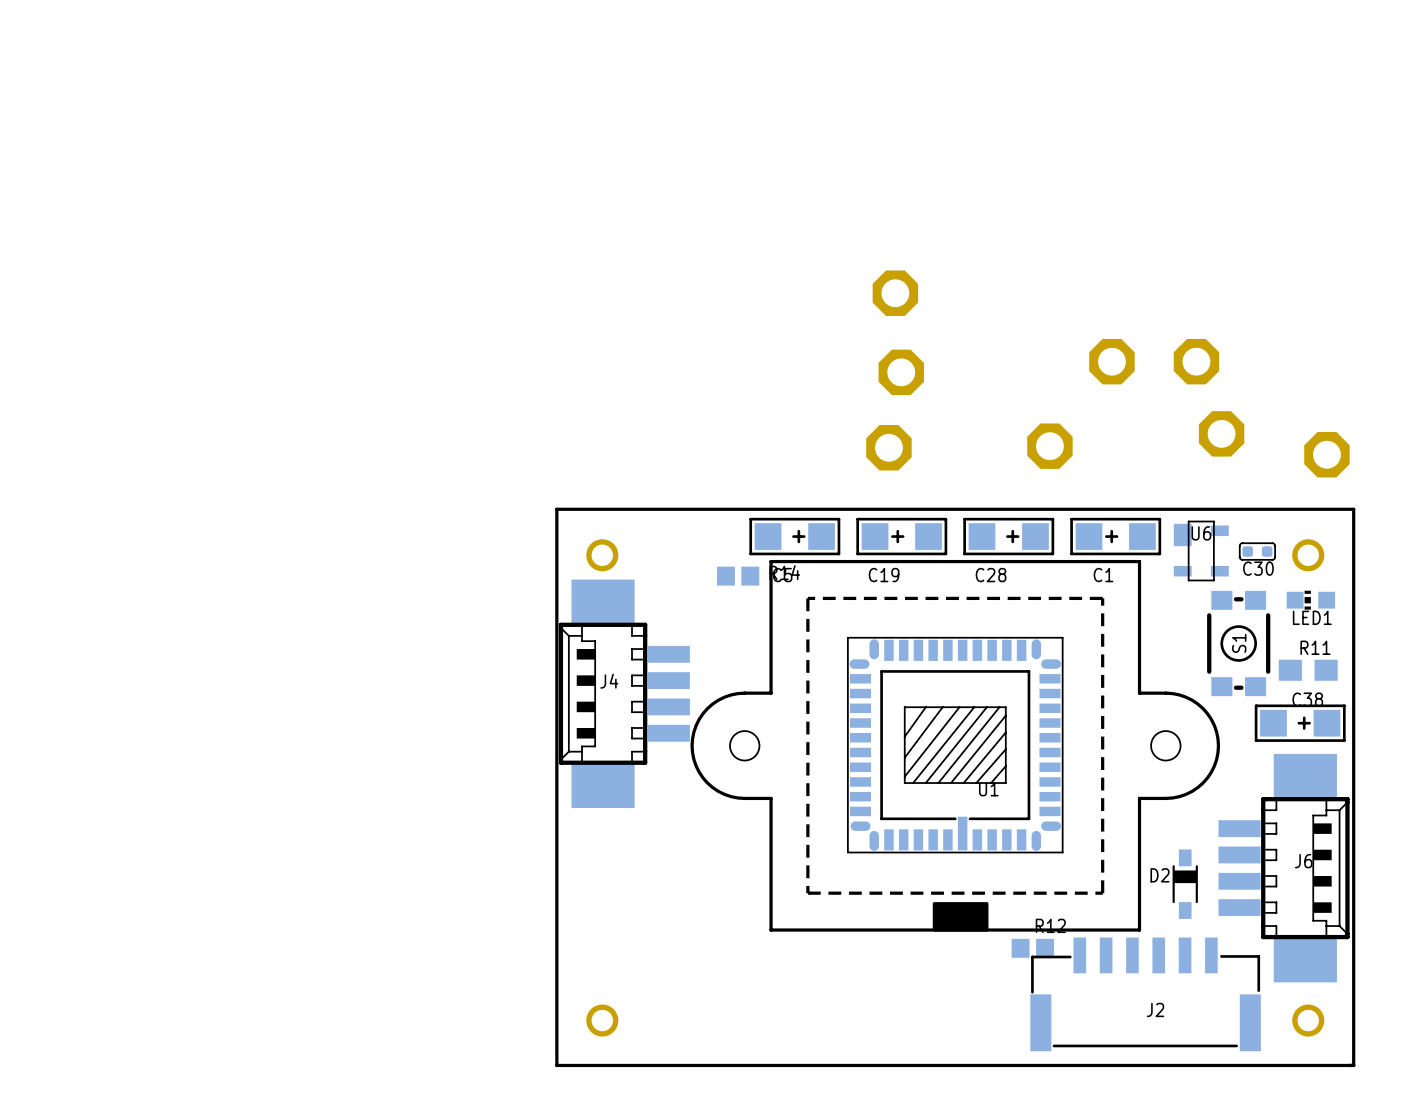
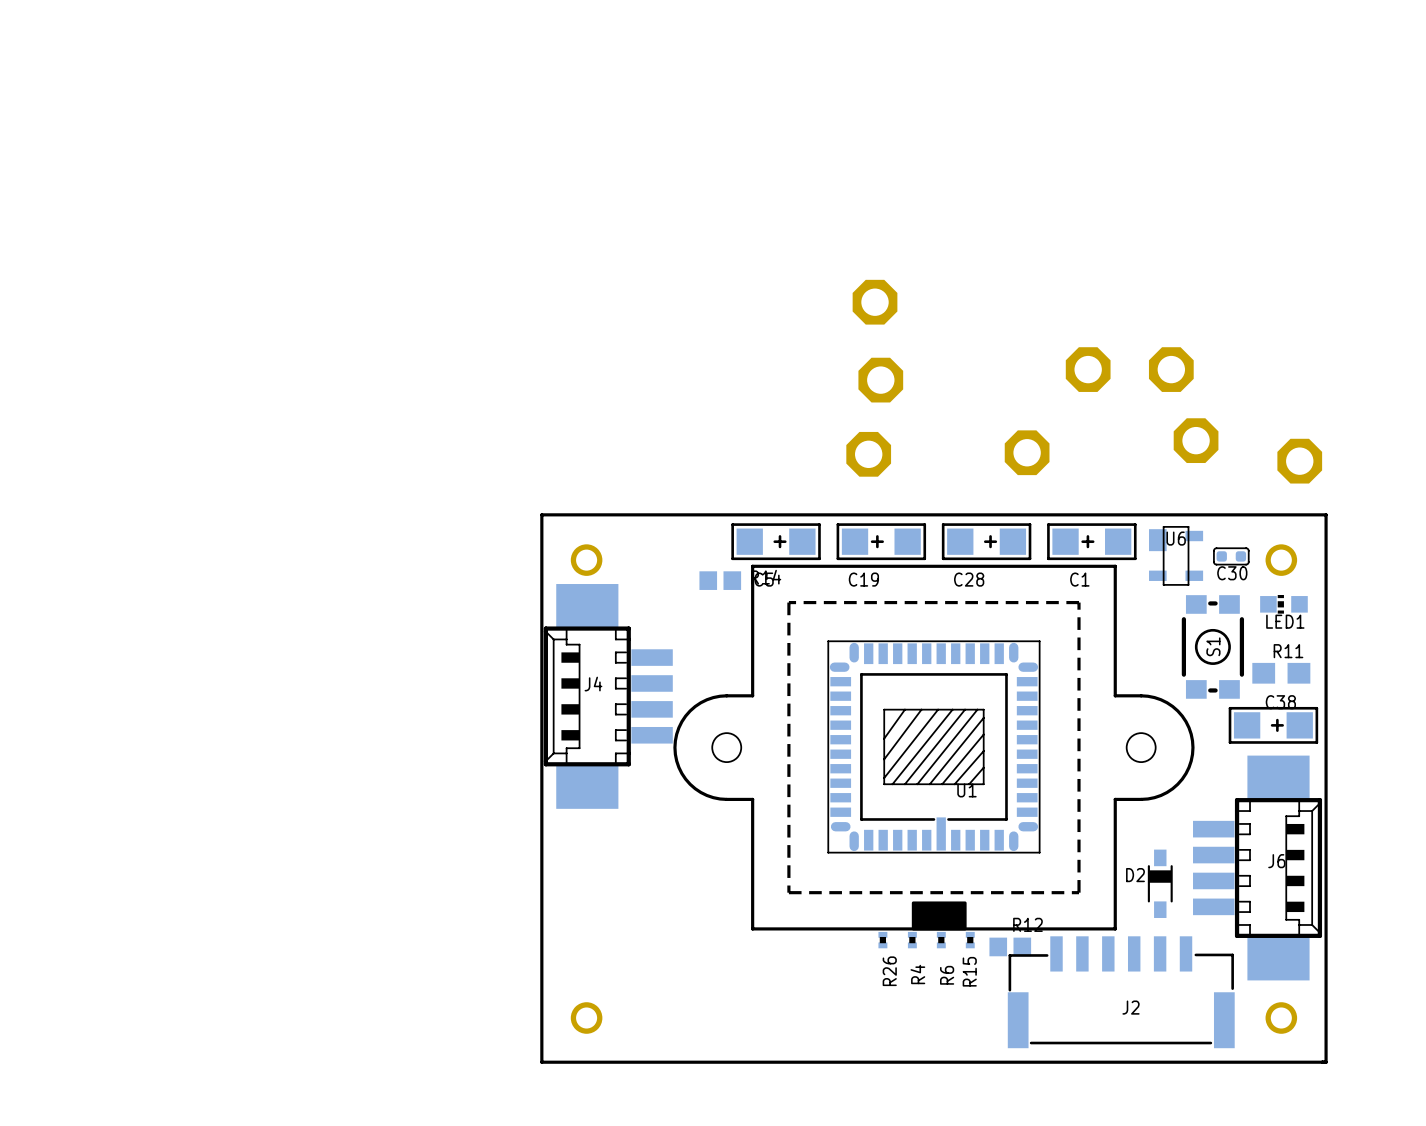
R26: none -> (882, 940)
R4: none -> (912, 940)
R6: none -> (941, 940)
R15: none -> (970, 940)

